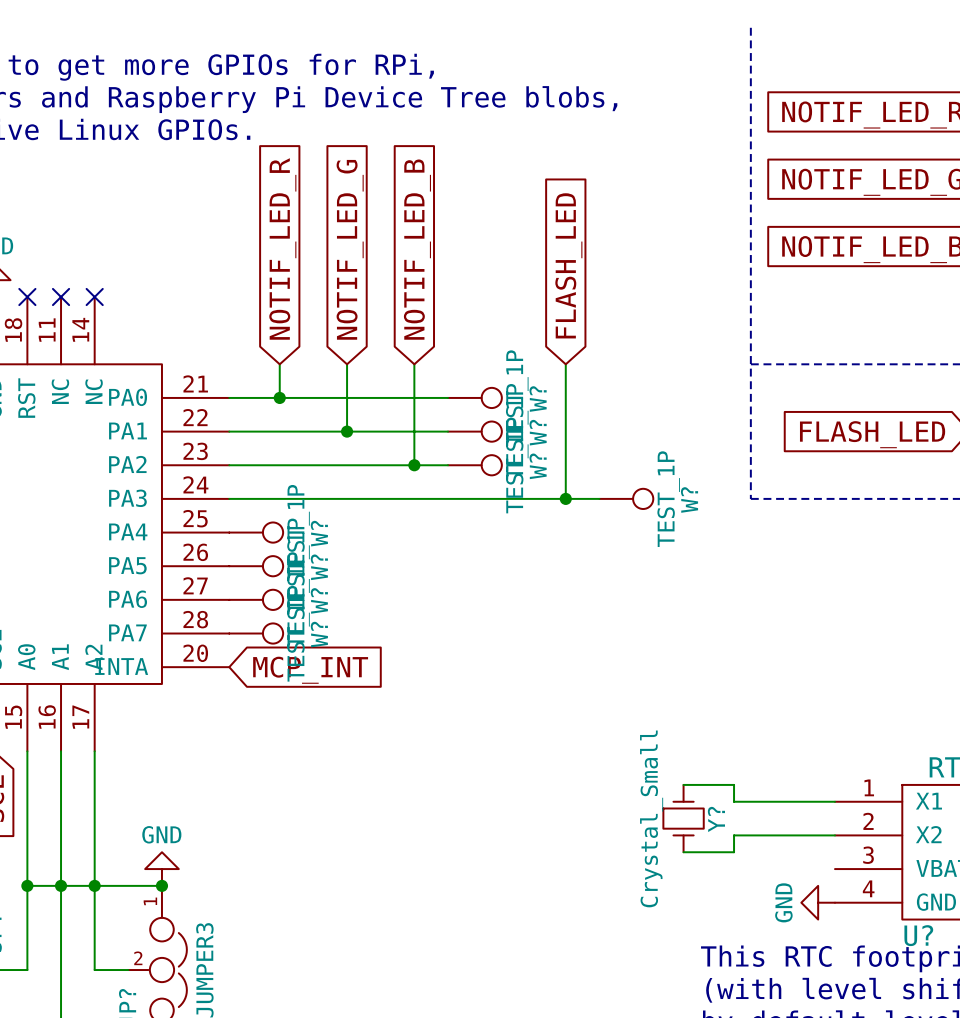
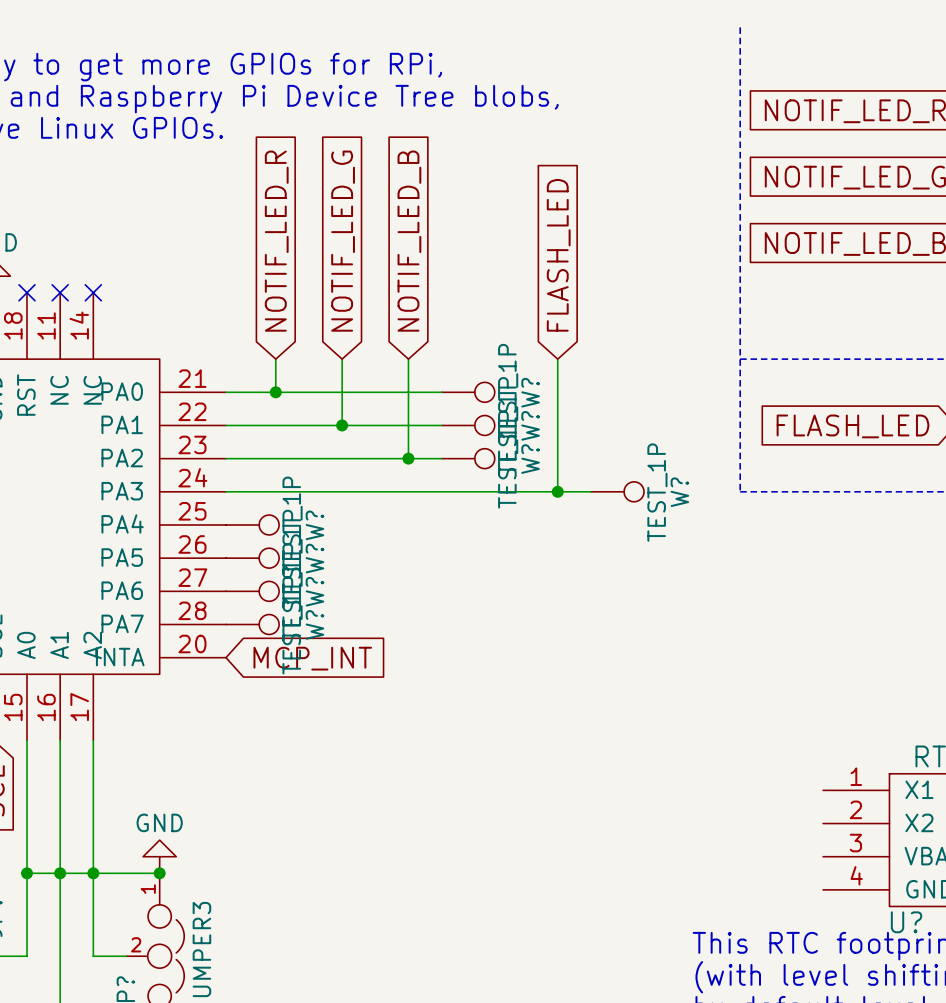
wire: (683, 784) (734, 784) (734, 801) (834, 801) -> none
Y?: Crystal_Small (683, 818) -> none
wire: (834, 835) (734, 835) (734, 852) (683, 852) -> none
power symbol: GND (818, 902) -> none

